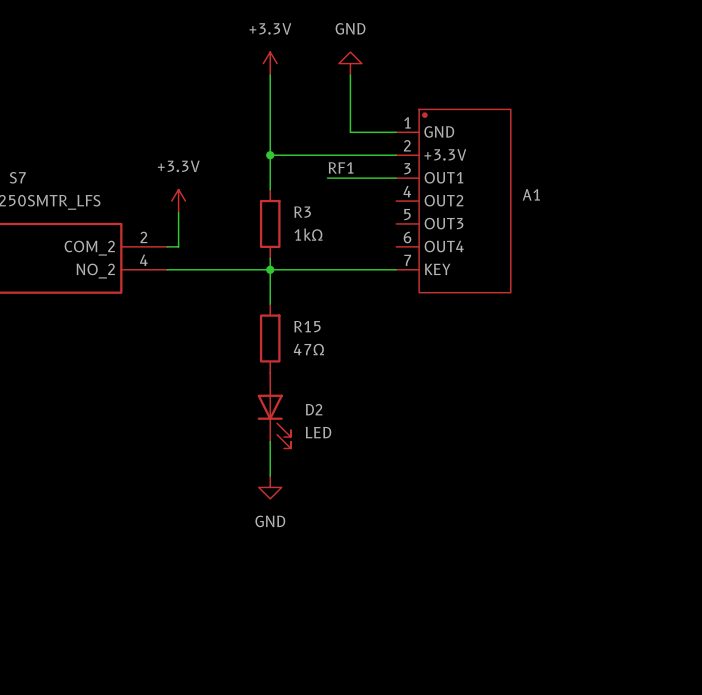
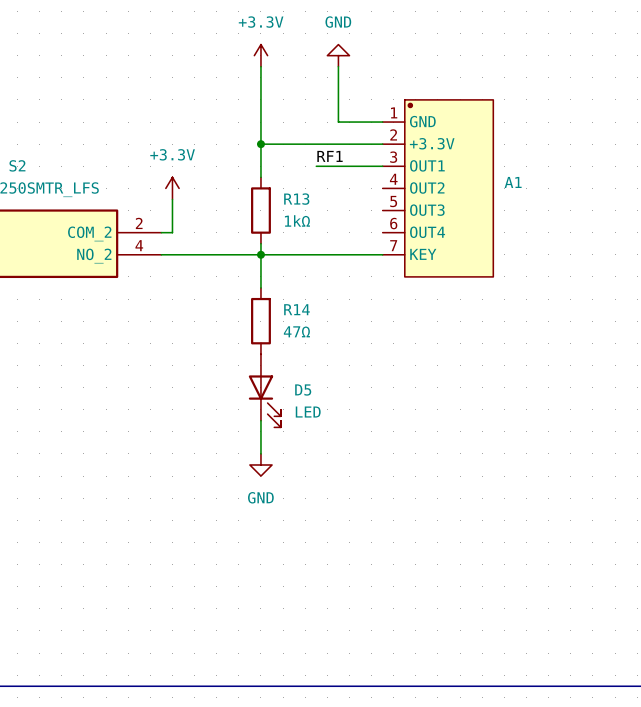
S7 name: S7 (17, 177) -> S2 (17, 165)
R3 name: R3 (302, 212) -> R13 (296, 199)
R15 name: R15 (307, 326) -> R14 (296, 309)
D2 name: D2 (314, 409) -> D5 (303, 390)

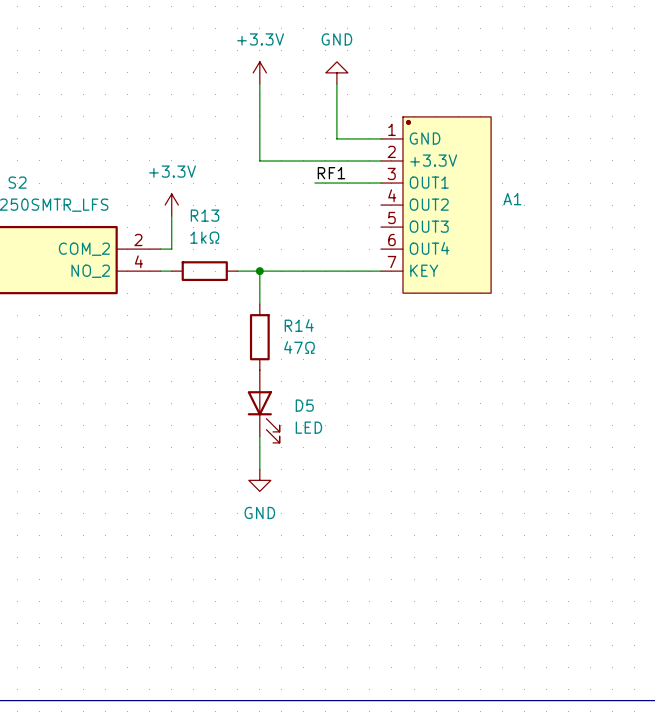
wire: (260, 144) (260, 177) -> none
junction: (260, 144) -> none
R13 name position: R13 (296, 199) -> R13 (205, 215)
R13 rotation: 0° (260, 210) -> 90° clockwise (204, 271)
R13 position: (260, 210) -> (204, 271)
R13 value position: 1kΩ (297, 220) -> 1kΩ (204, 237)
wire: (260, 243) (260, 254) -> none
wire: (172, 254) (238, 254) -> none

